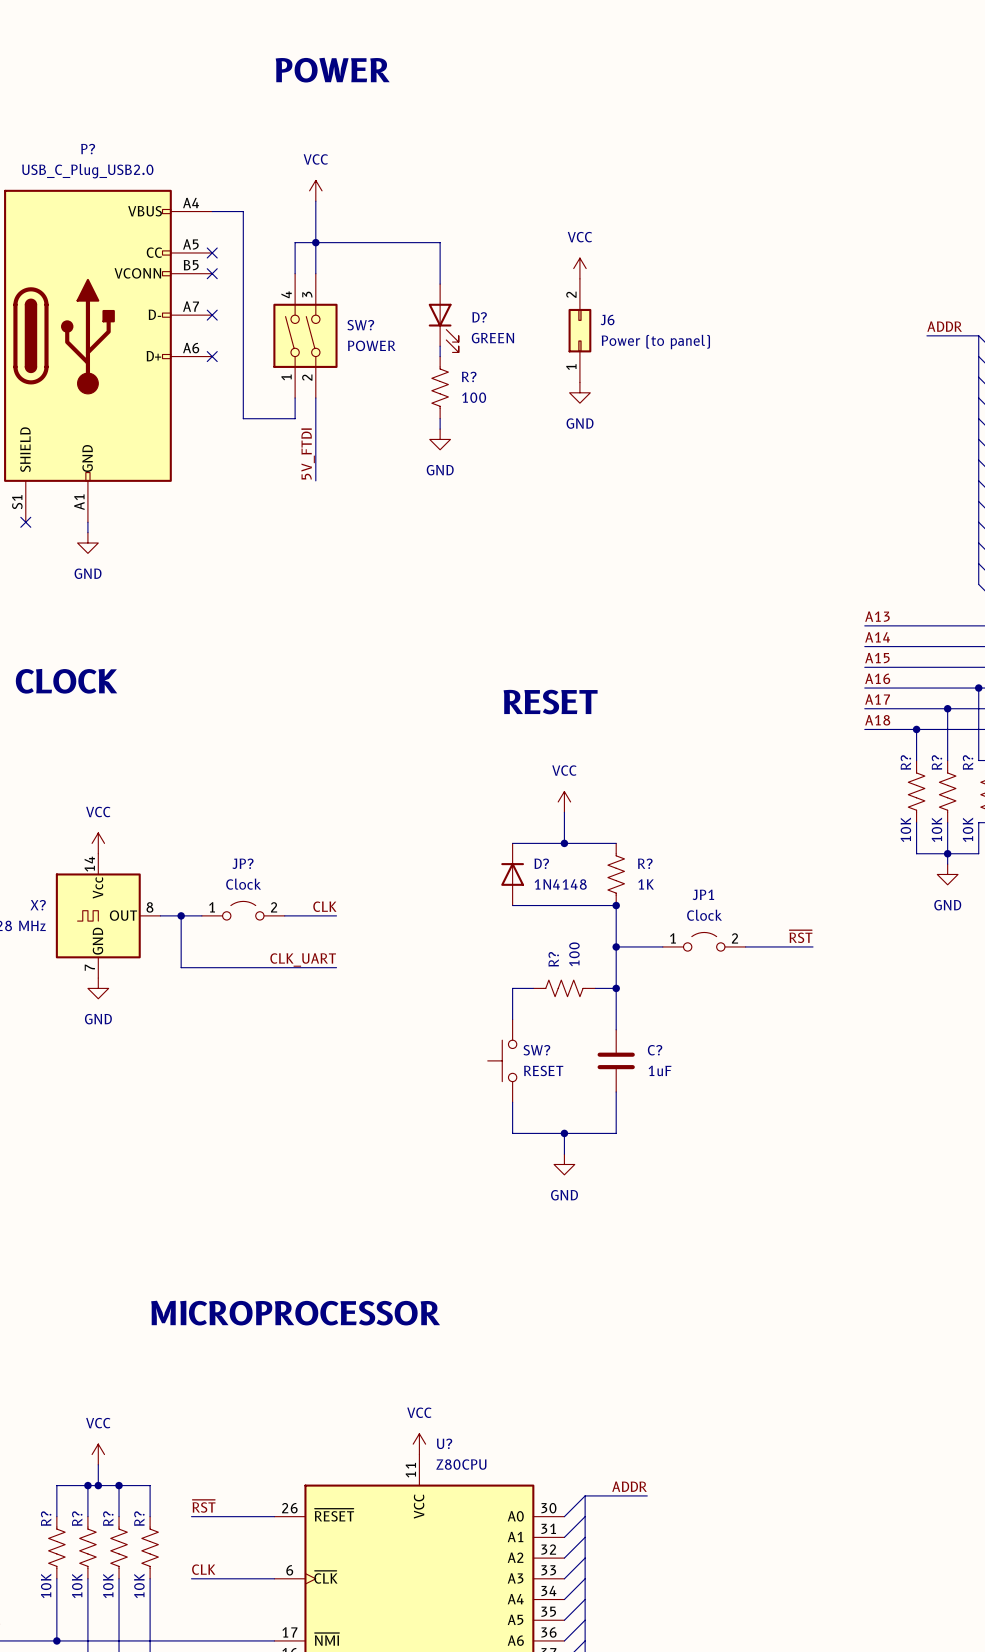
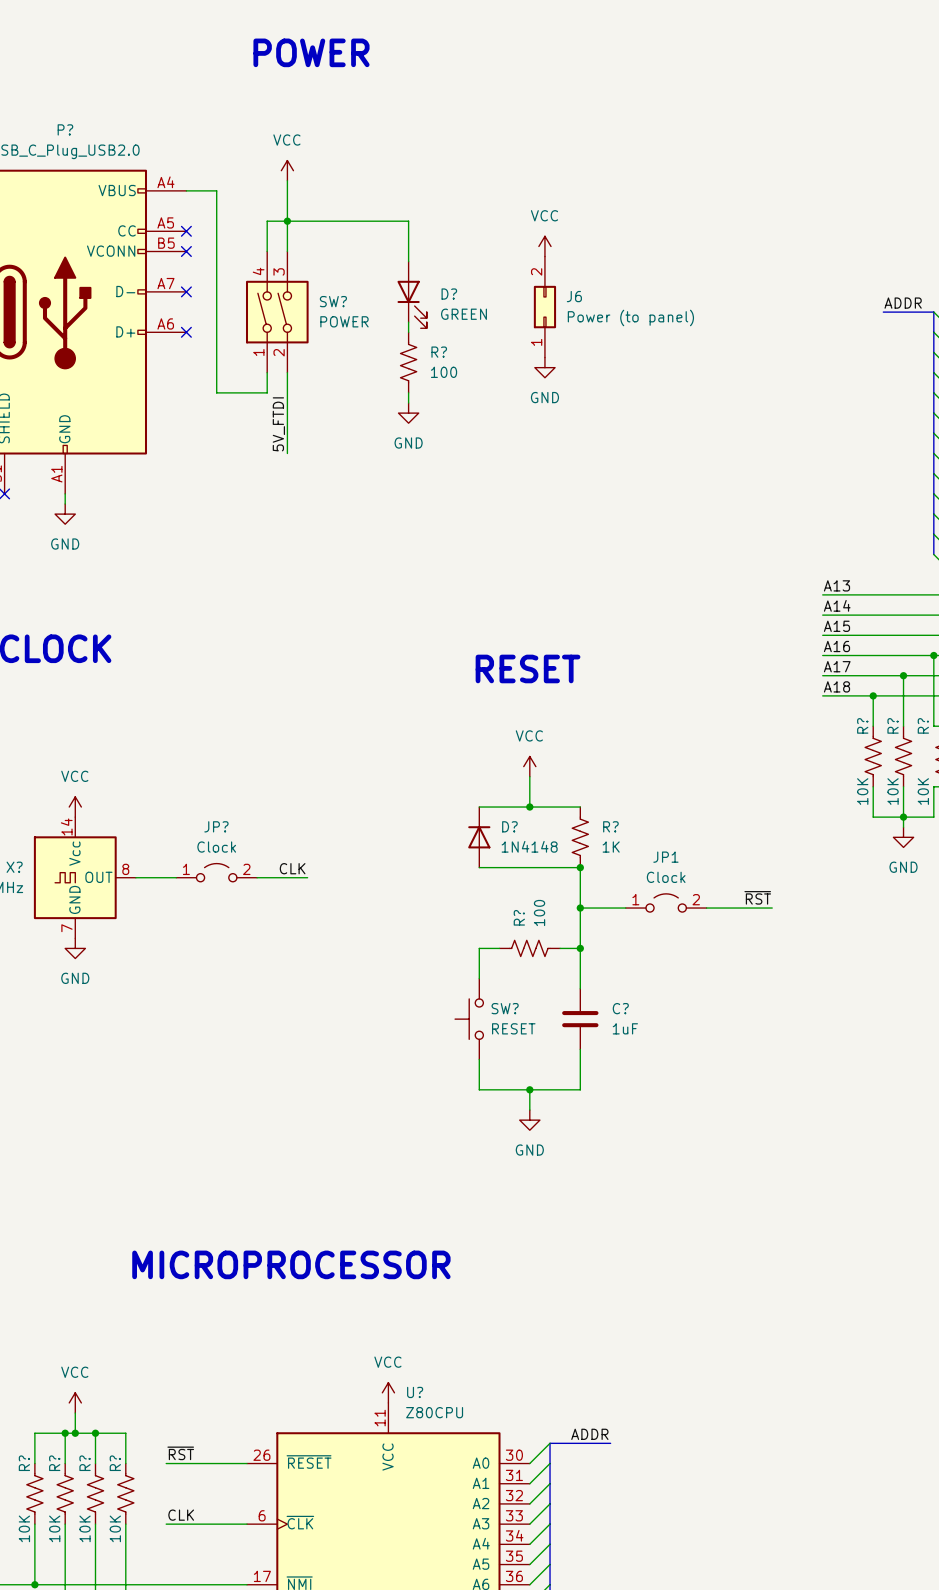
wire: (181, 915) (181, 967) (336, 967) -> none
junction: (181, 915) -> none
label: CLK_UART (303, 959) -> none

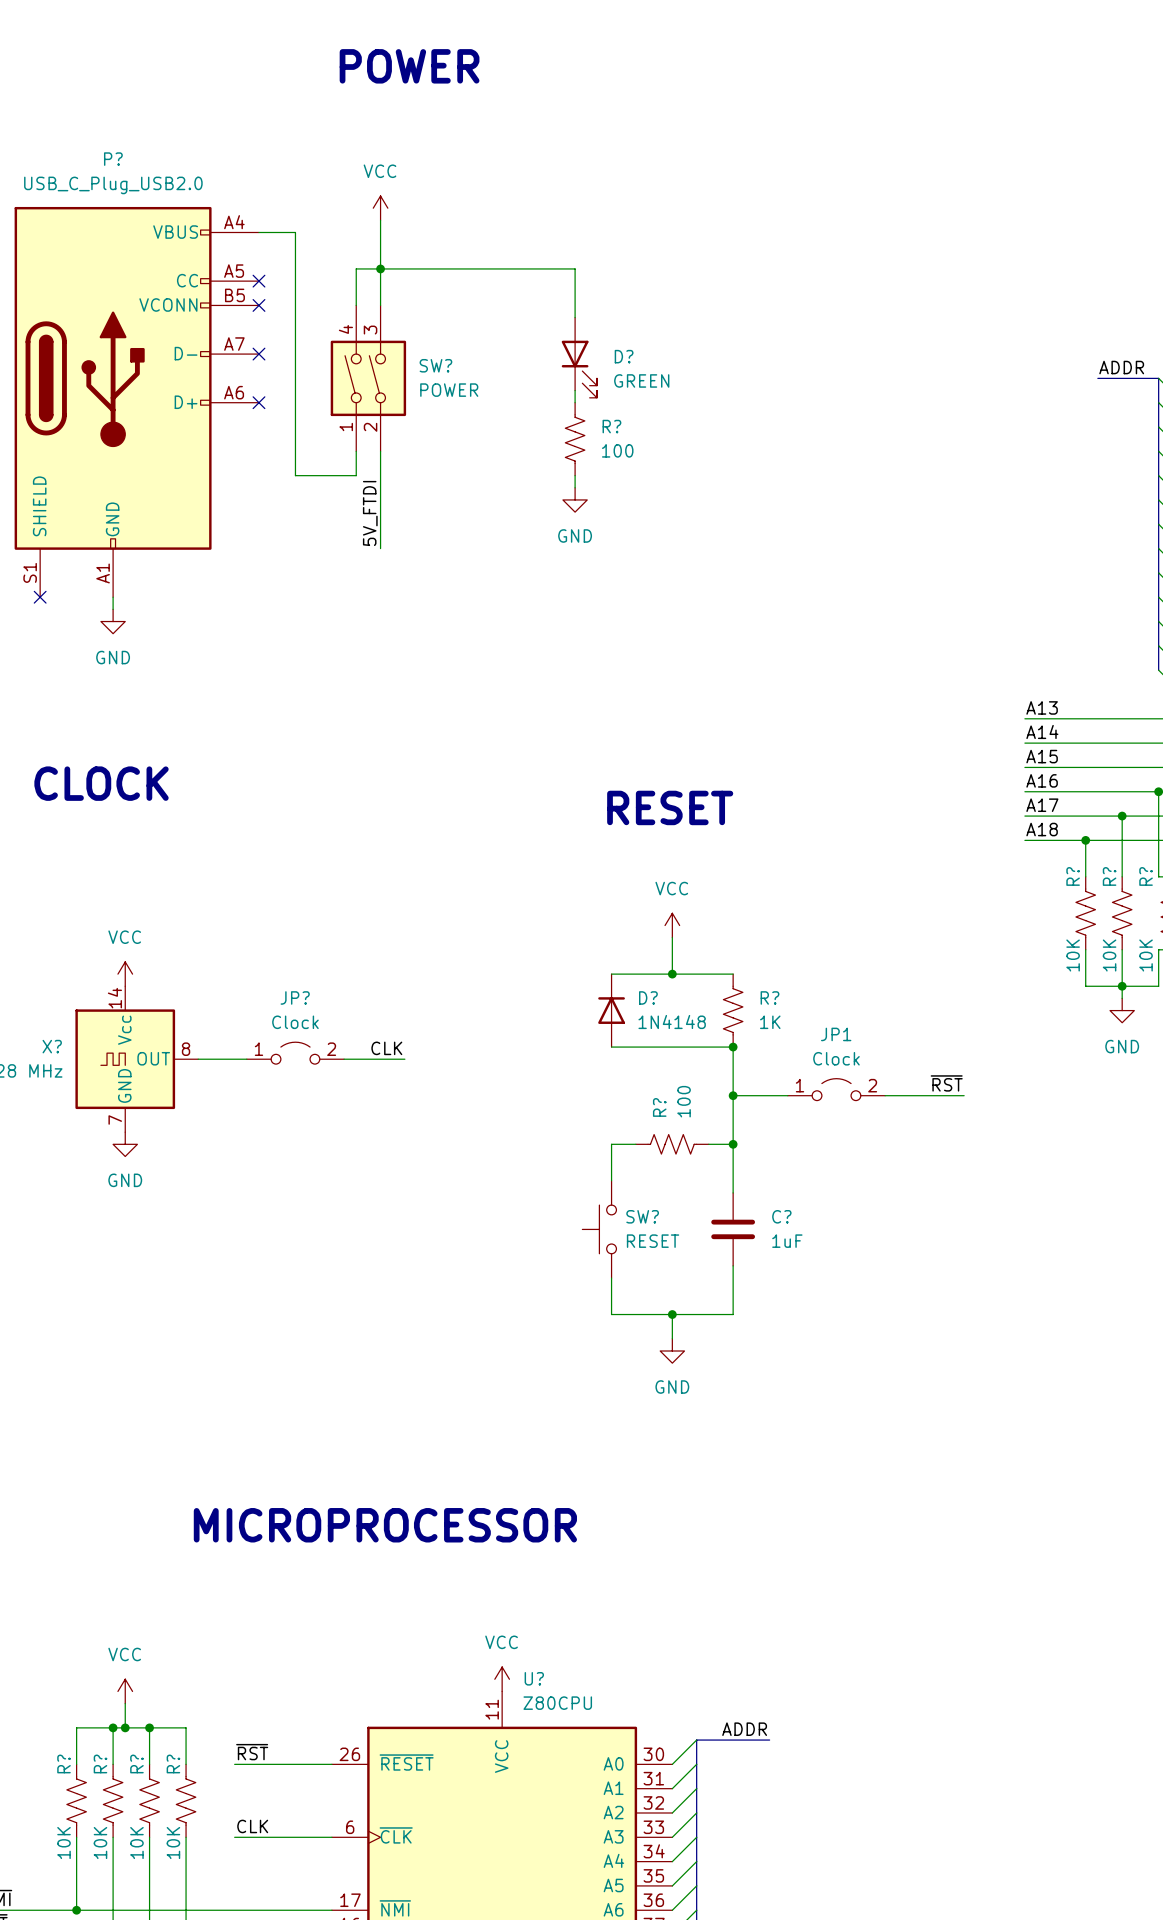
wire: (408, 221) (408, 261) -> (526, 268) (575, 268) (575, 317)
power symbol: VCC (544, 246) -> none
D? position: (412, 294) -> (579, 357)
J6: Power (to panel) (544, 307) -> none
wire: (408, 322) (408, 332) -> (575, 390) (575, 402)
R? position: (408, 362) -> (575, 439)
power symbol: GND (544, 367) -> none
wire: (408, 392) (408, 403) -> (575, 475) (575, 487)
power symbol position: GND (408, 413) -> GND (575, 499)

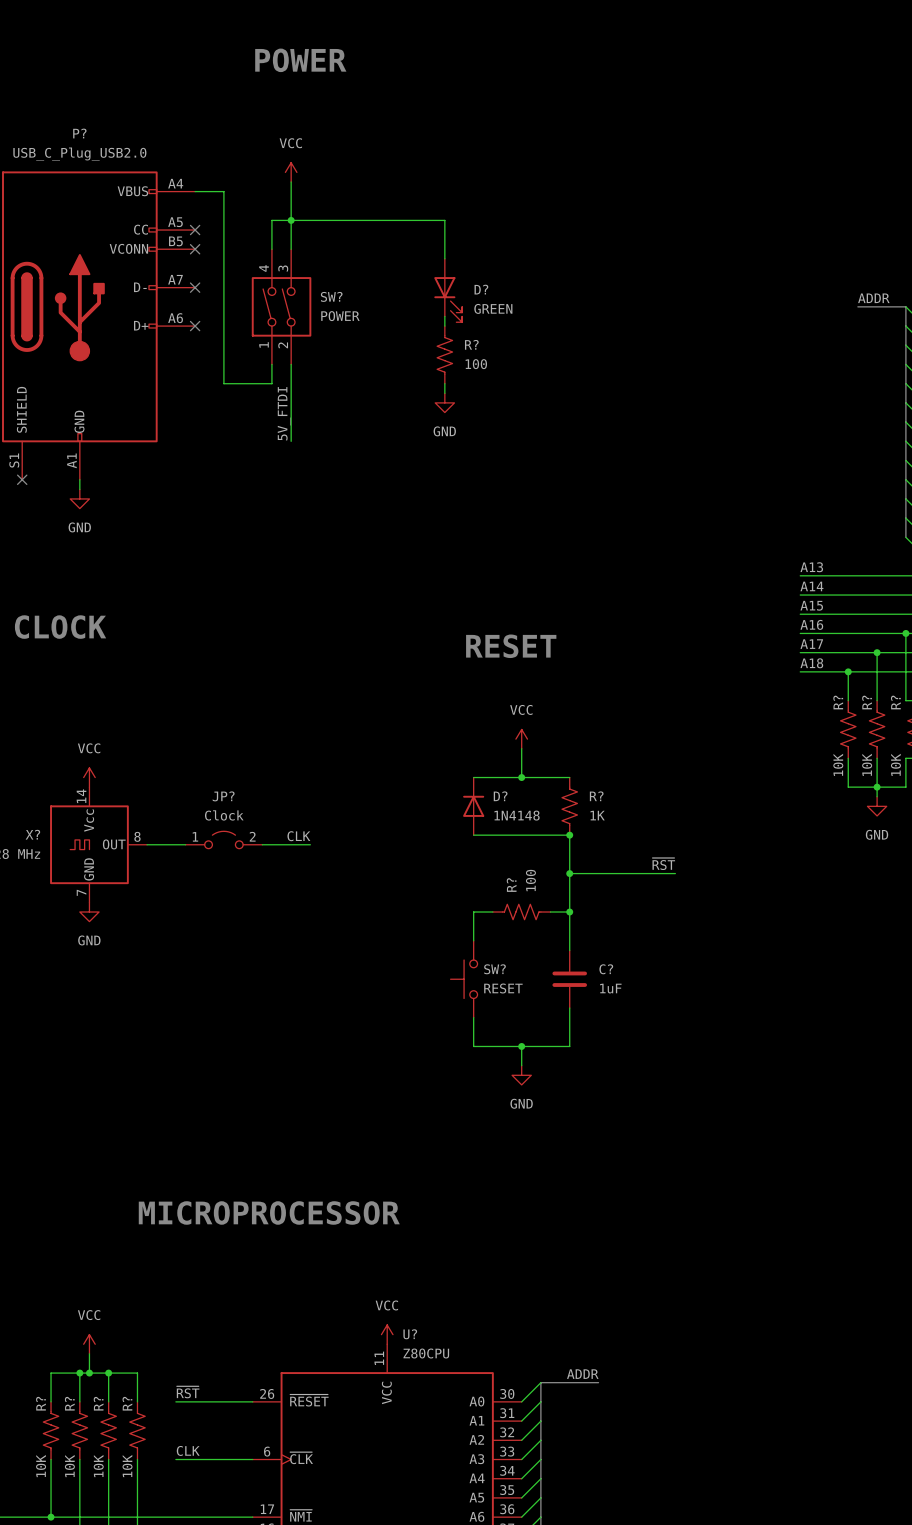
label position: ~{RST} (946, 1083) -> ~{RST} (663, 864)
JP1: Clock (836, 1089) -> none
wire: (885, 1095) (964, 1095) -> (612, 873) (675, 873)

